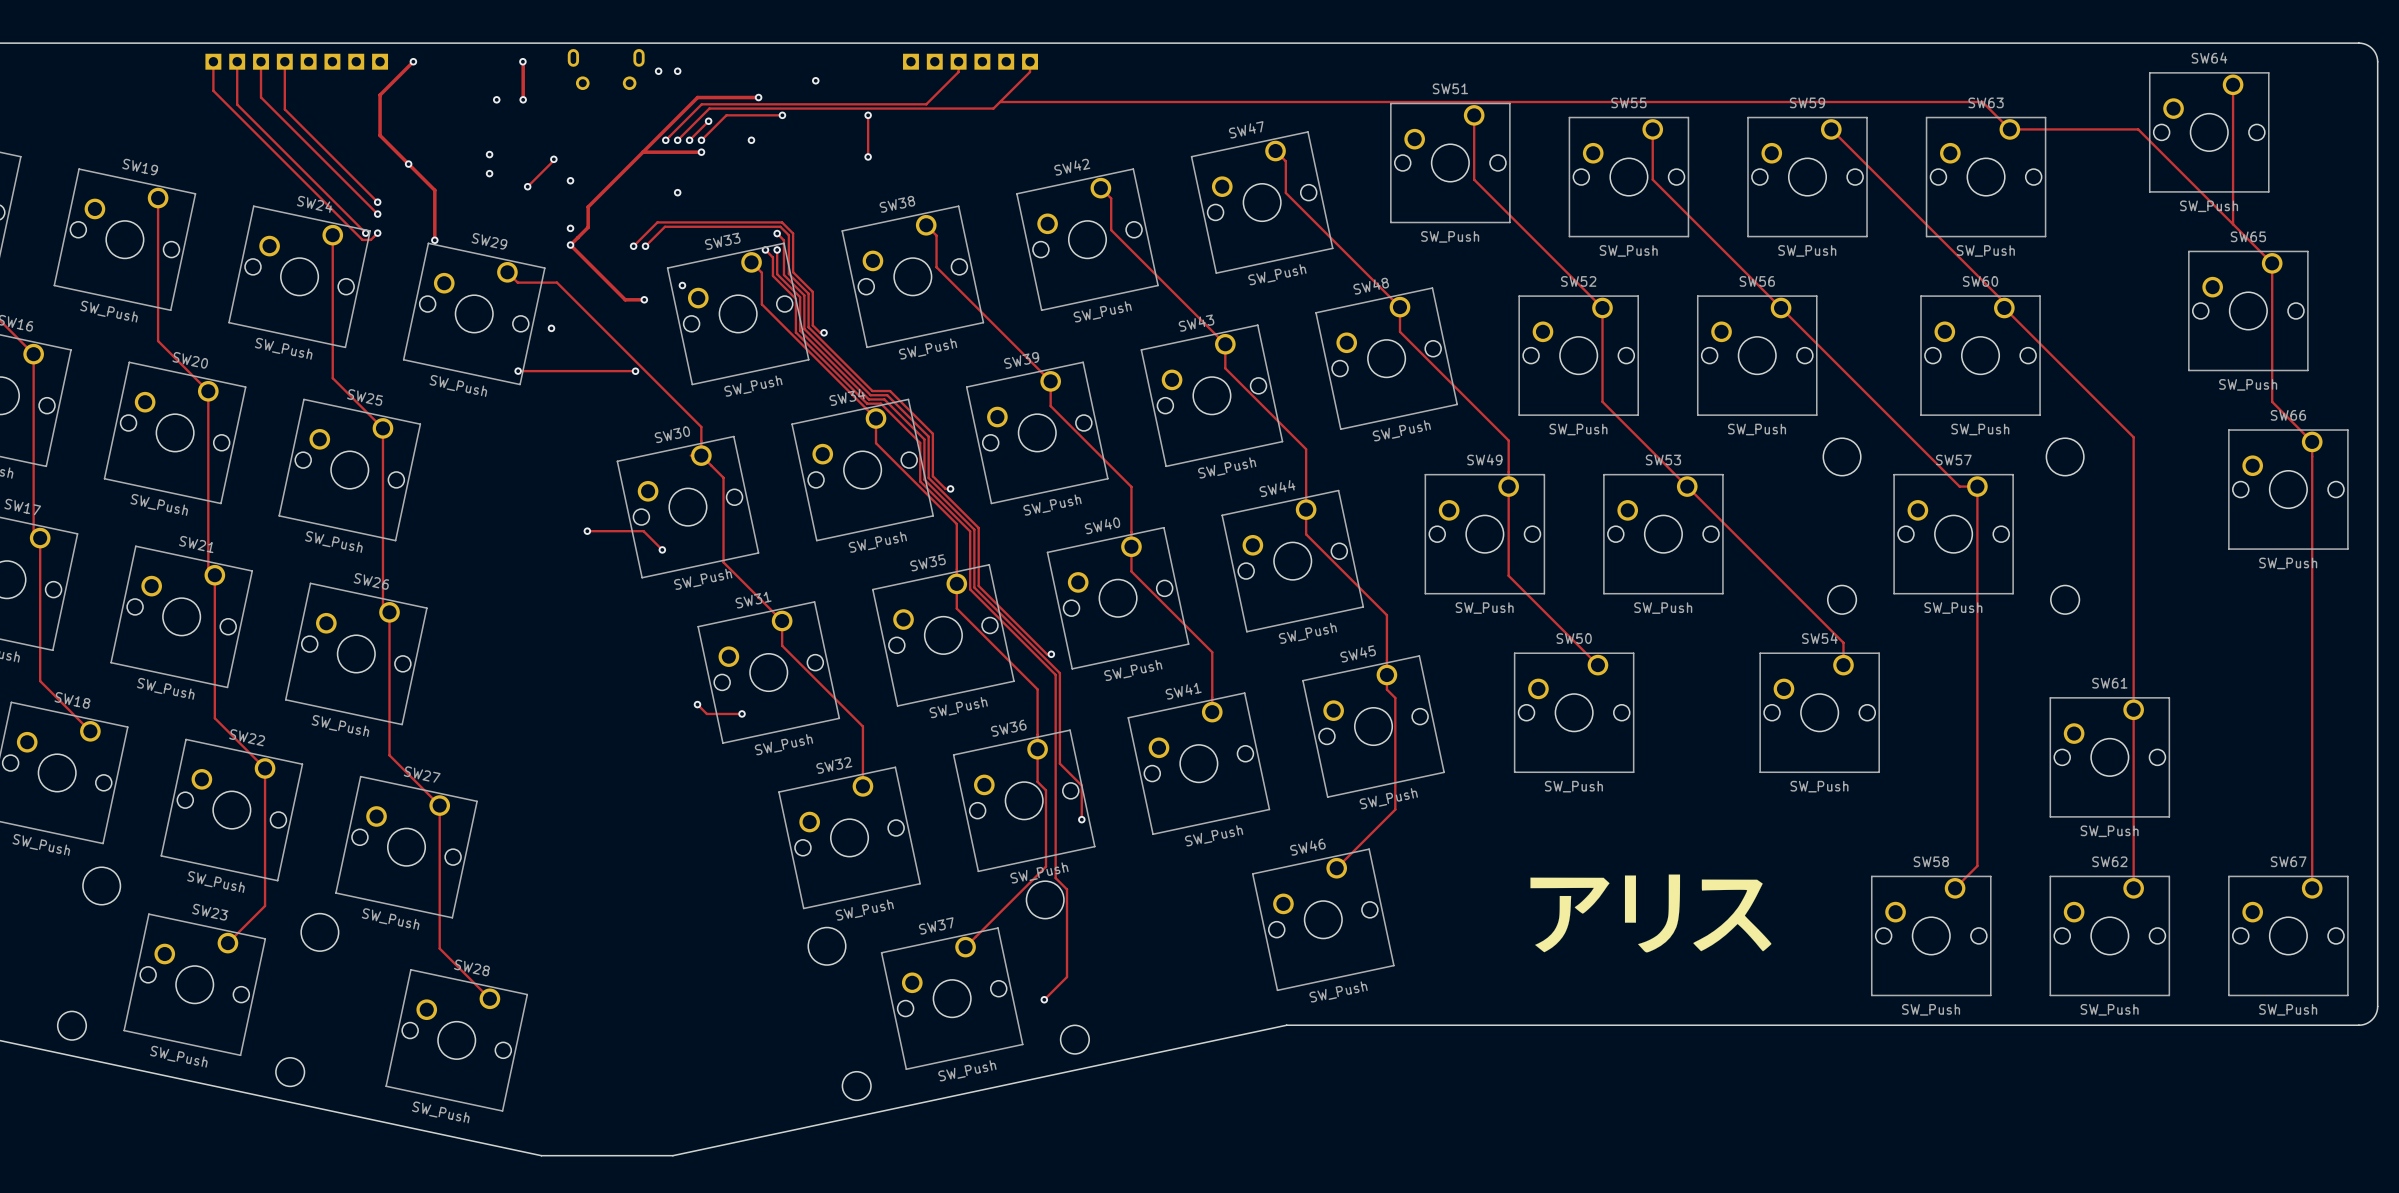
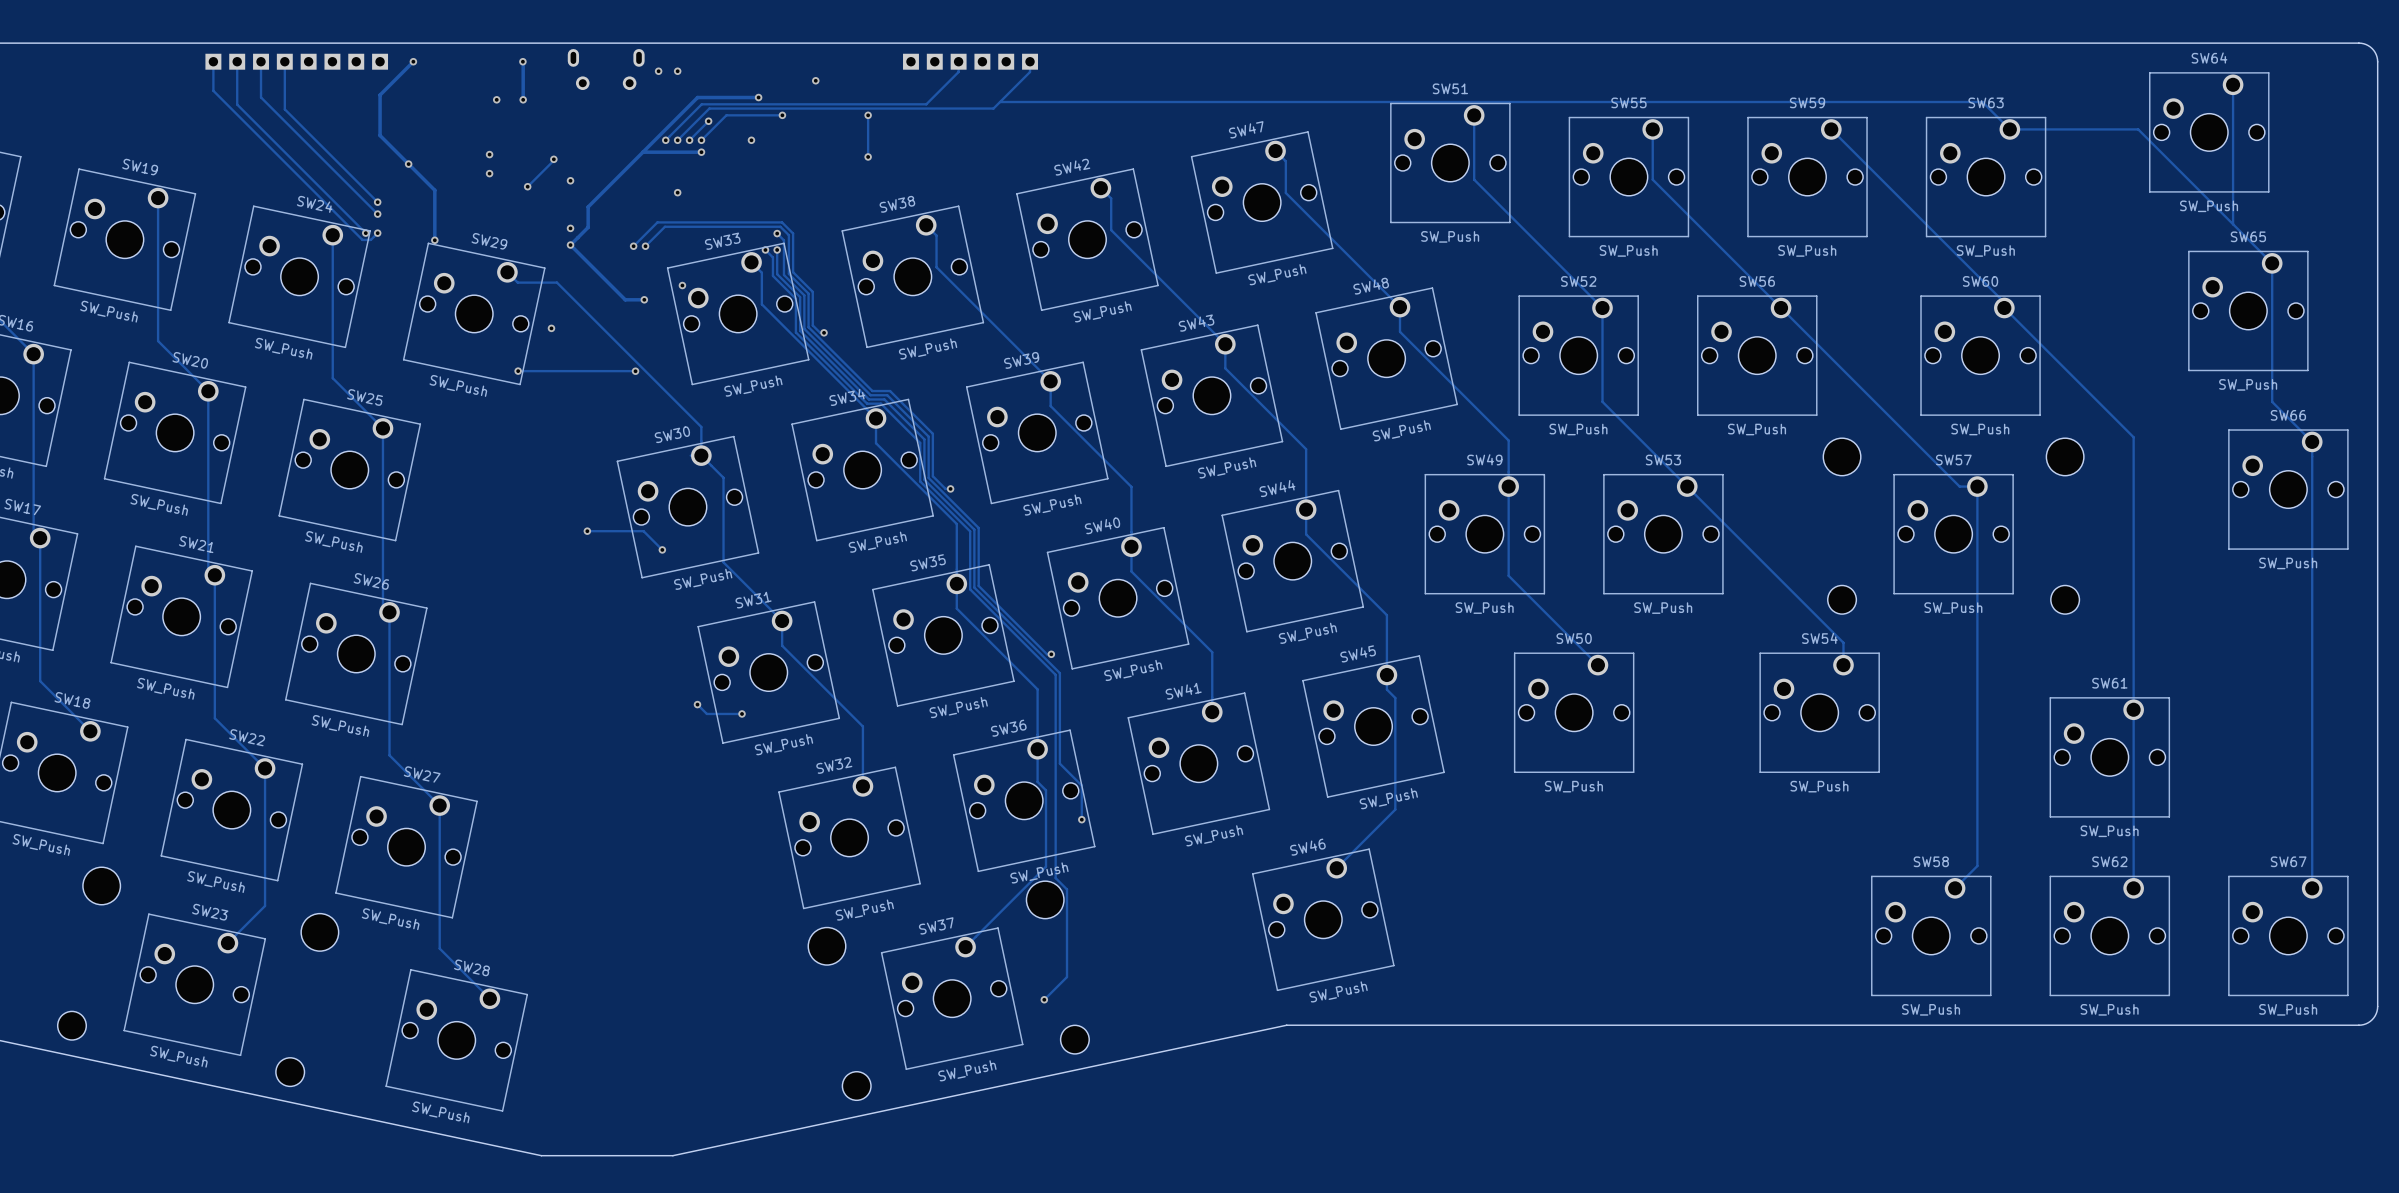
drawing: [1530, 874, 1772, 953] -> none

